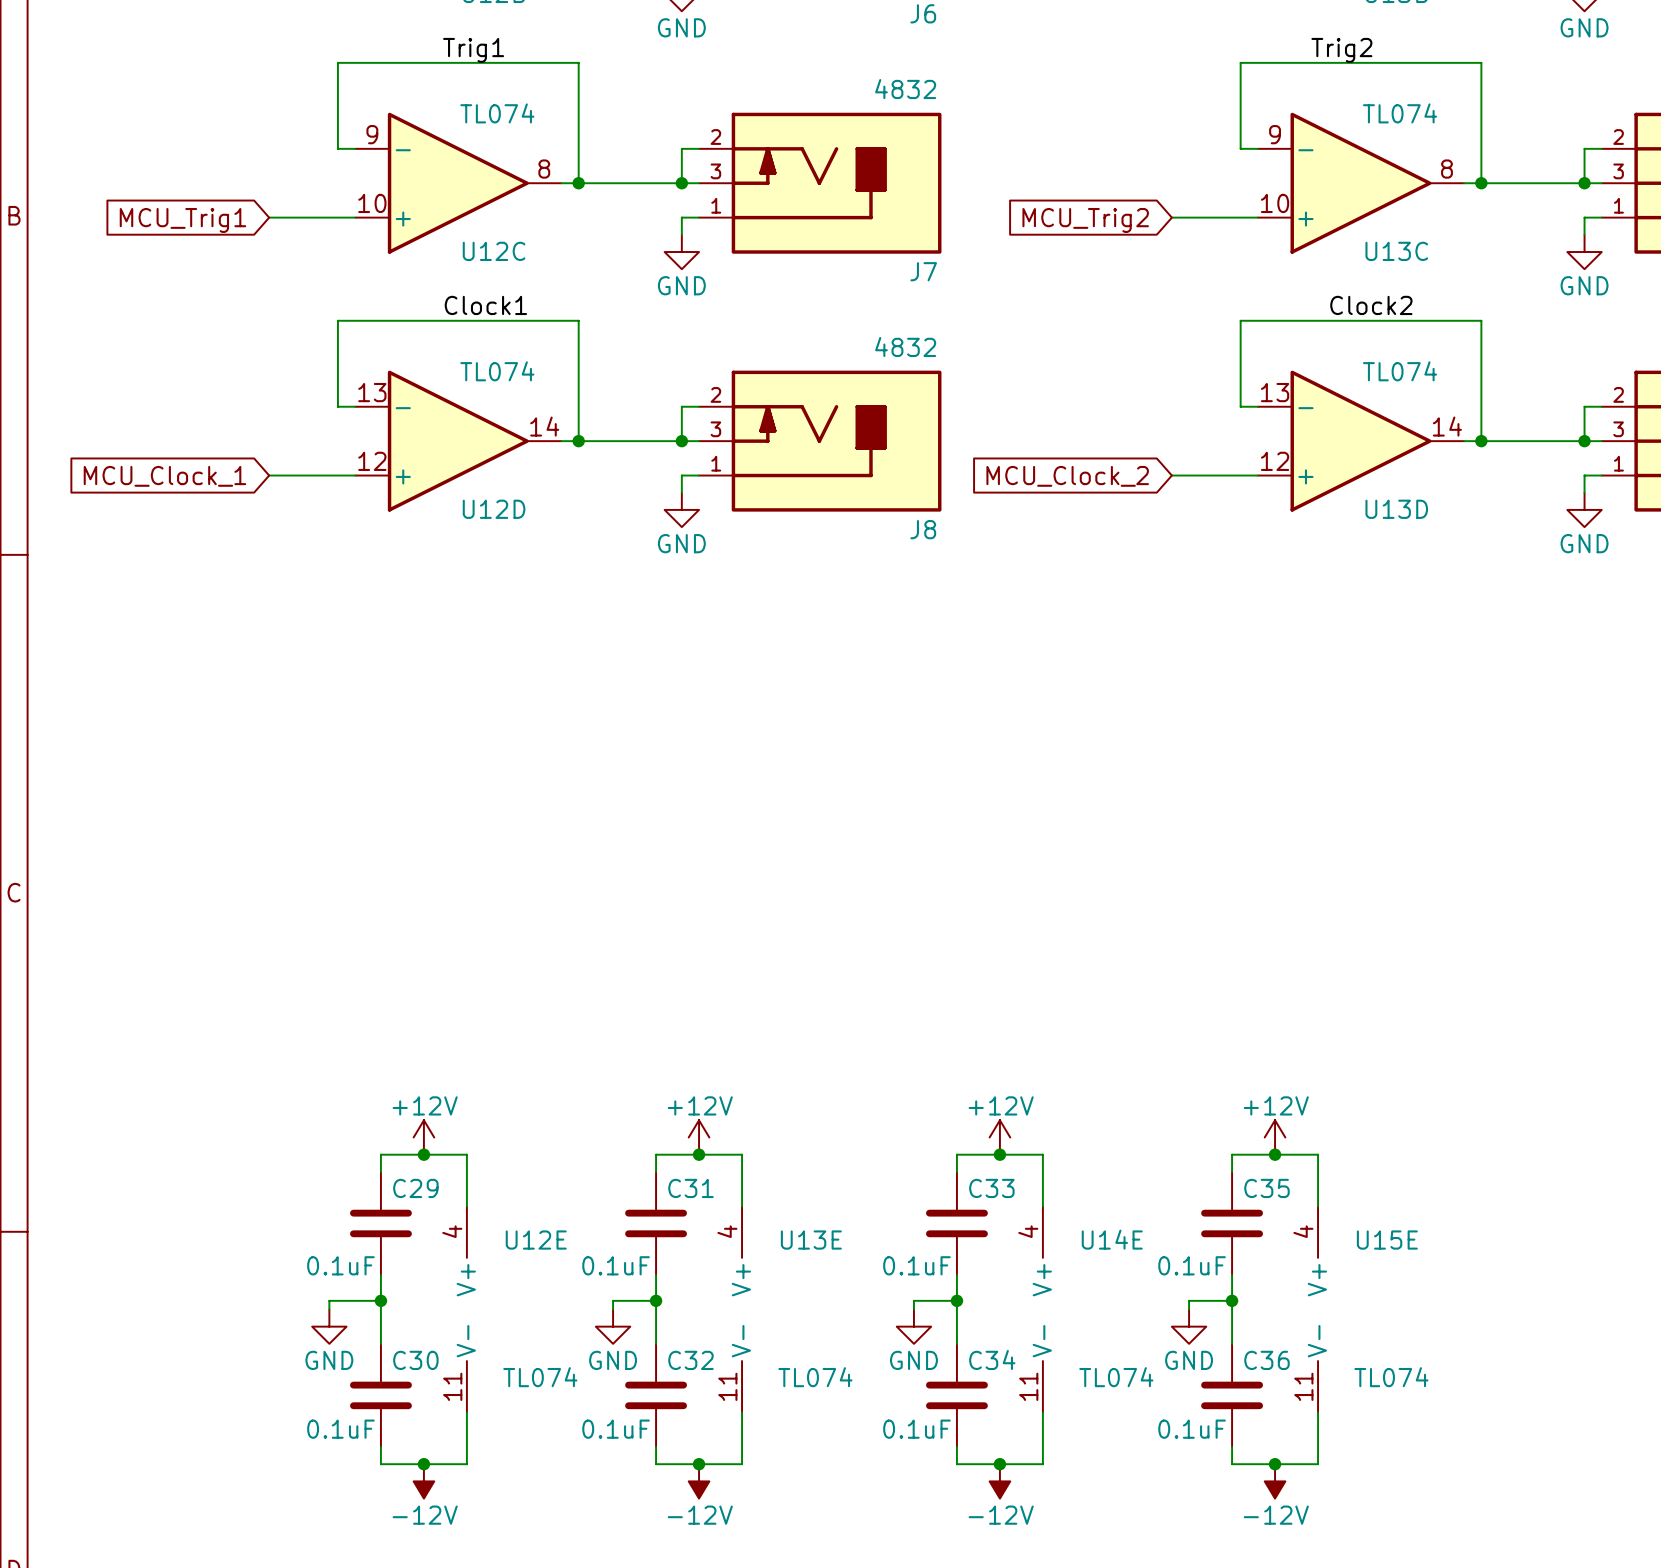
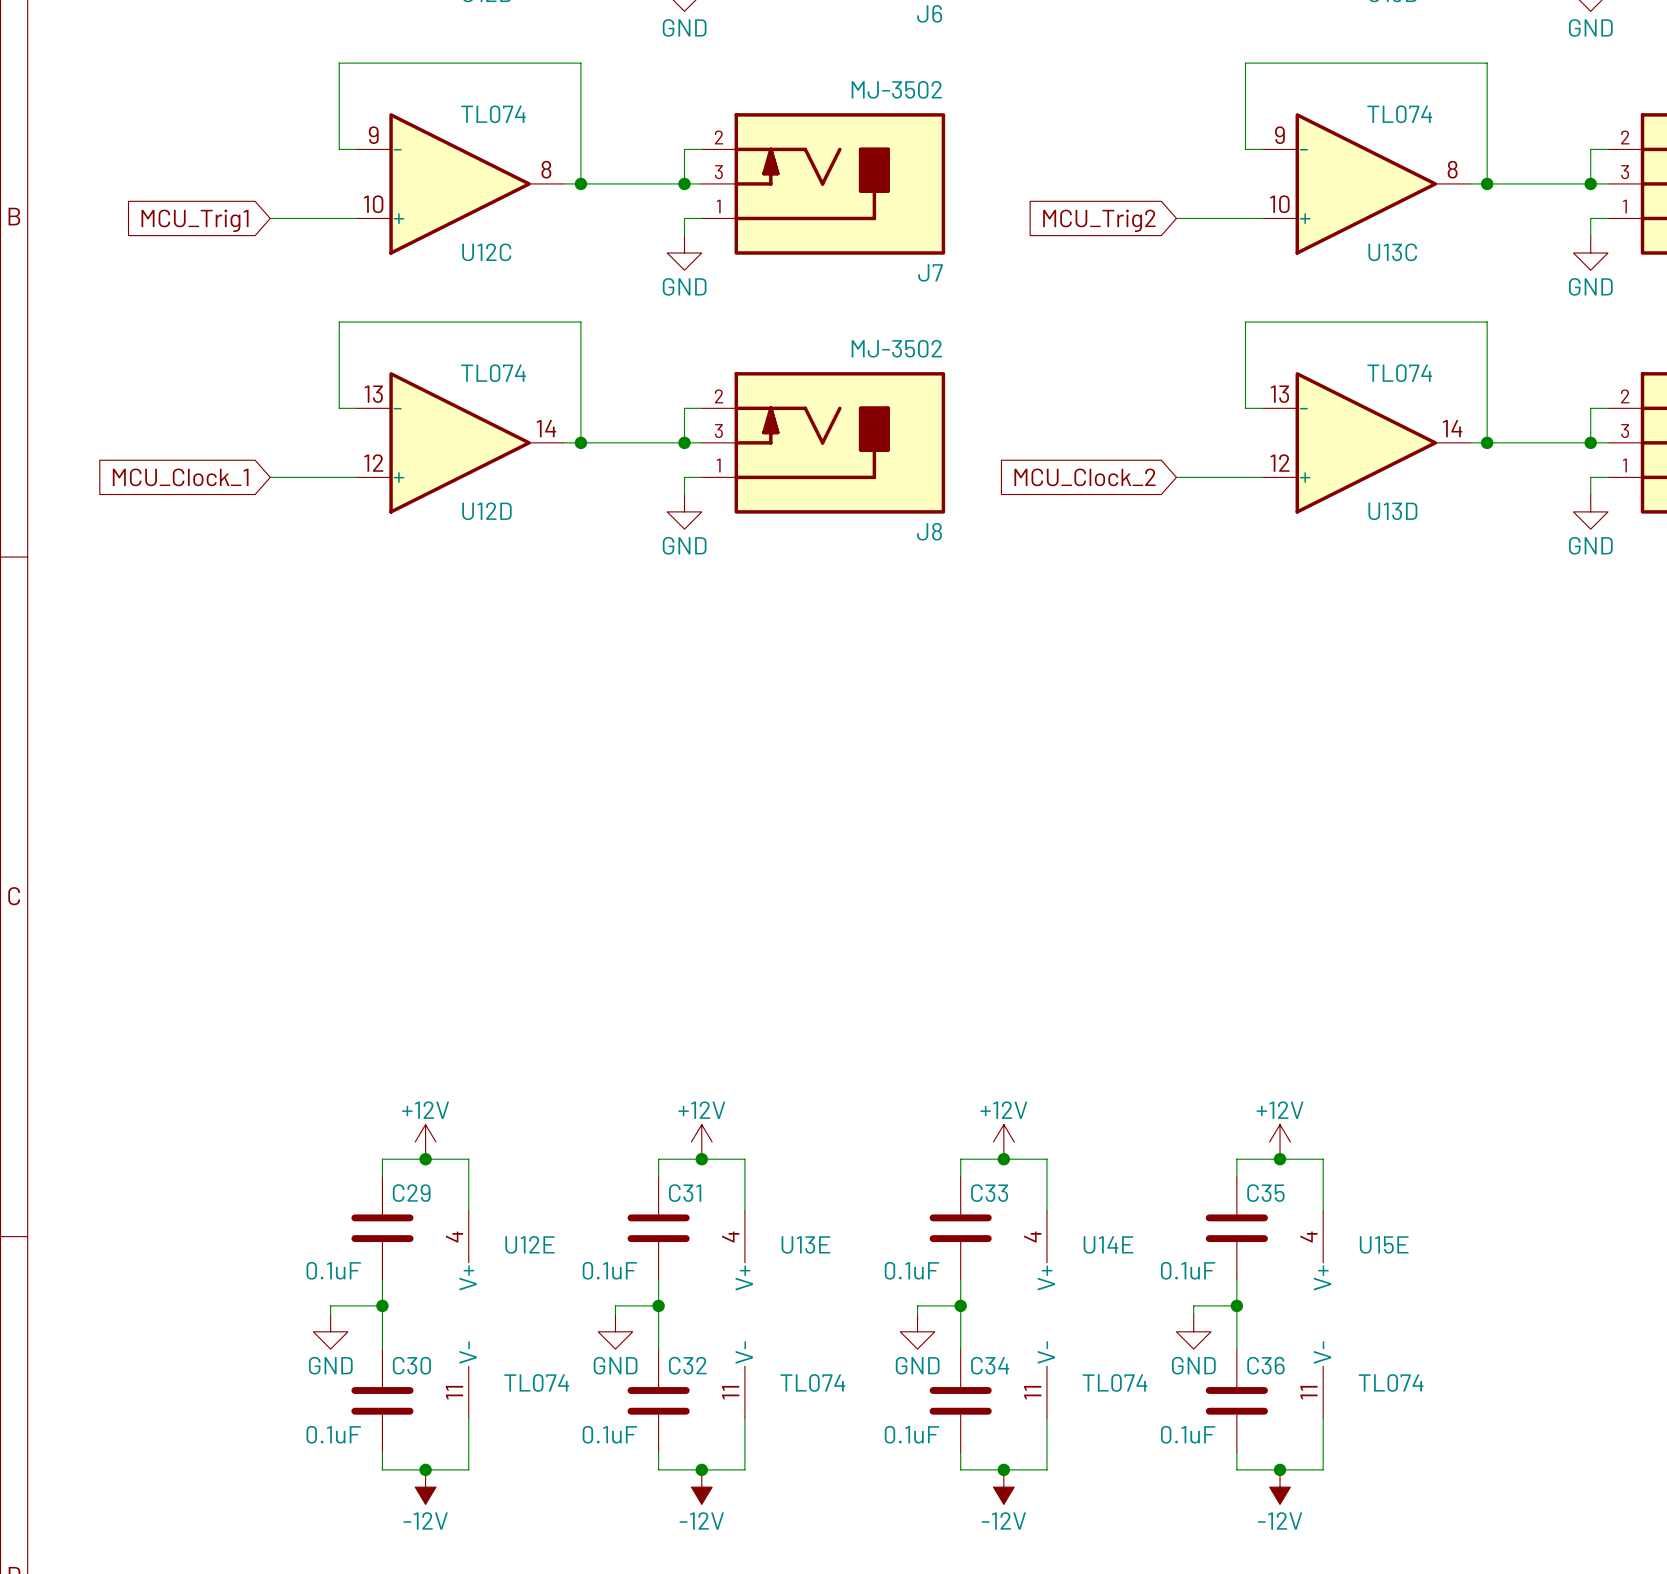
label: Trig1 (473, 50) -> none
label: Trig2 (1341, 50) -> none
J7 value: 4832 (905, 89) -> MJ-3502 (896, 89)
label: Clock1 (485, 305) -> none
label: Clock2 (1371, 305) -> none
J8 value: 4832 (905, 346) -> MJ-3502 (896, 348)

